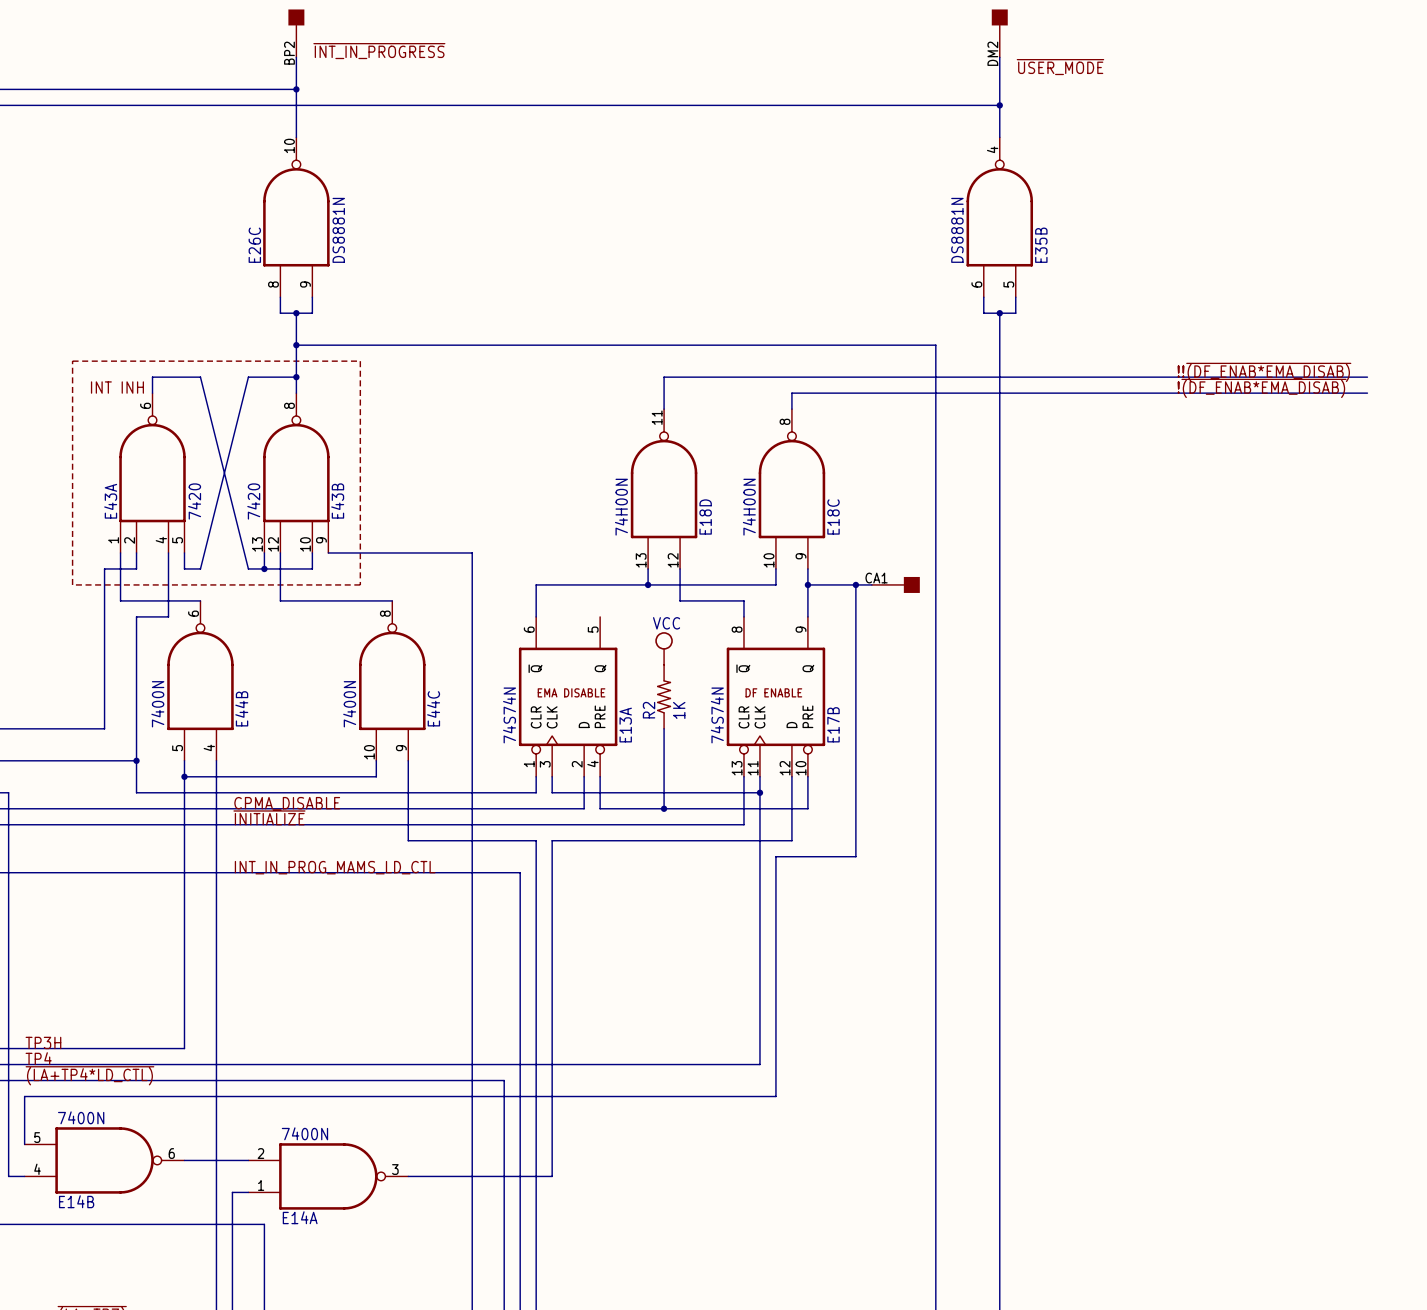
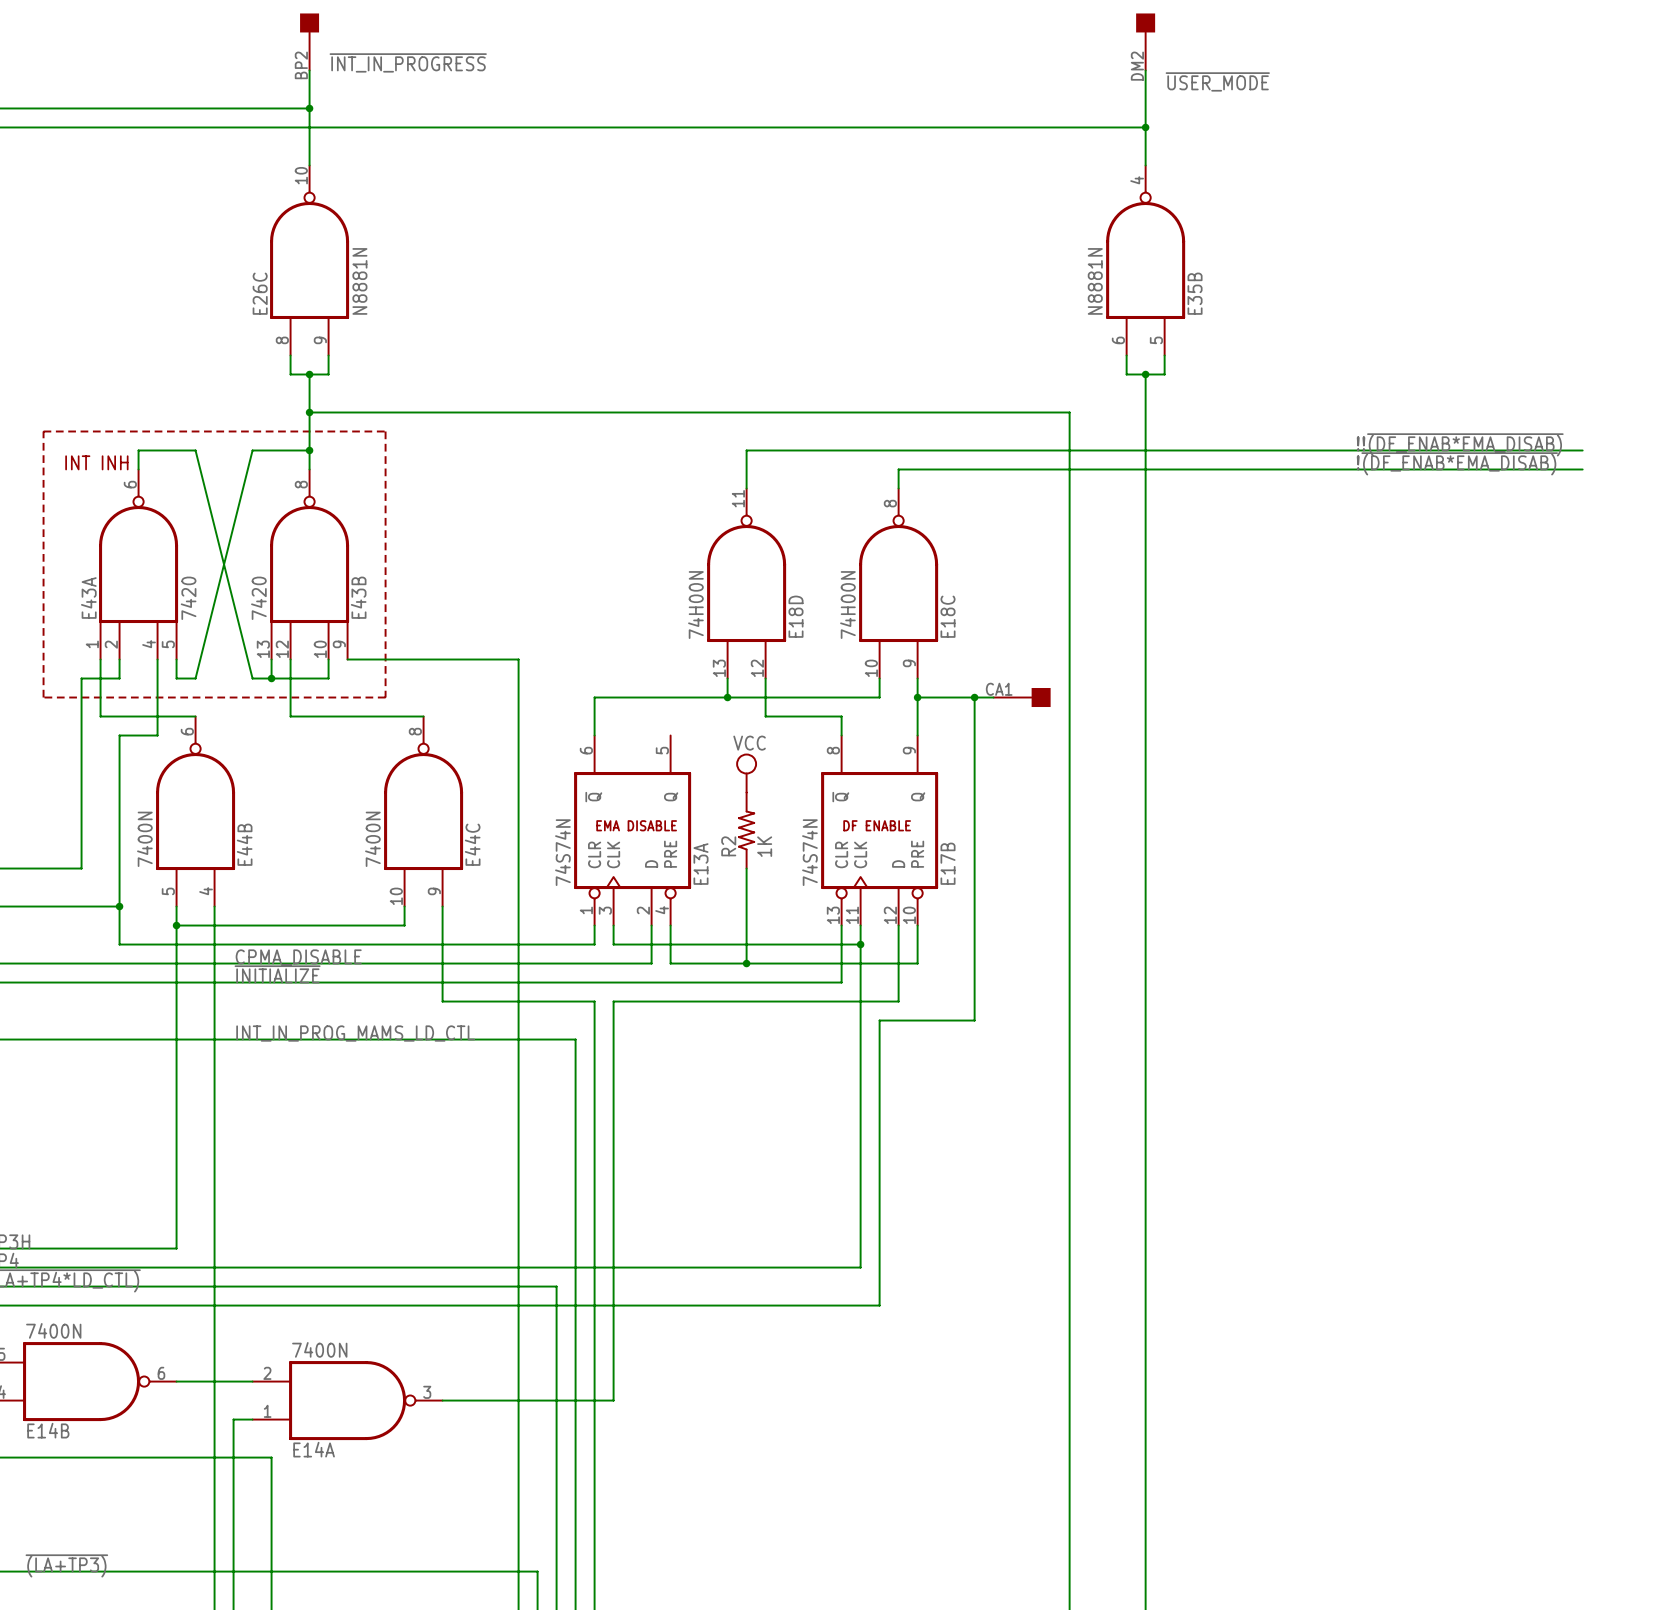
E26C value: DS8881N (338, 230) -> N8881N (359, 281)
E35B value: DS8881N (957, 230) -> N8881N (1095, 281)

